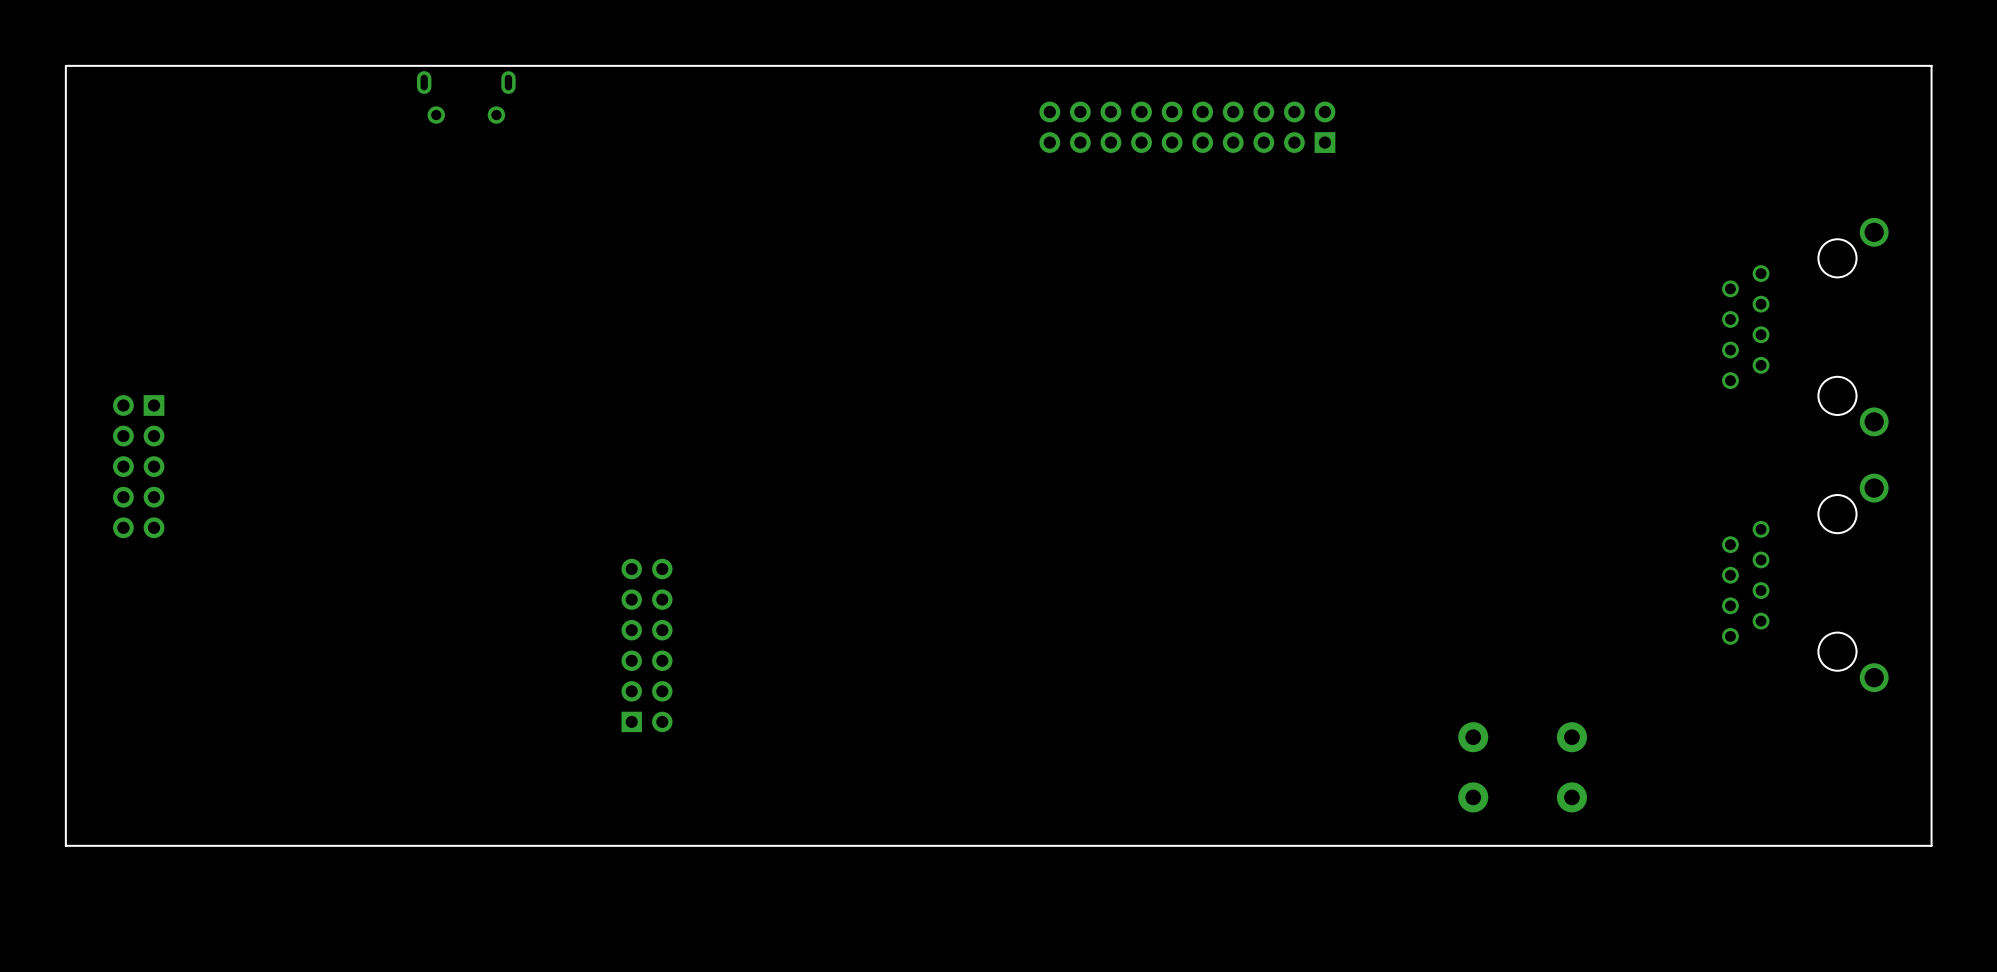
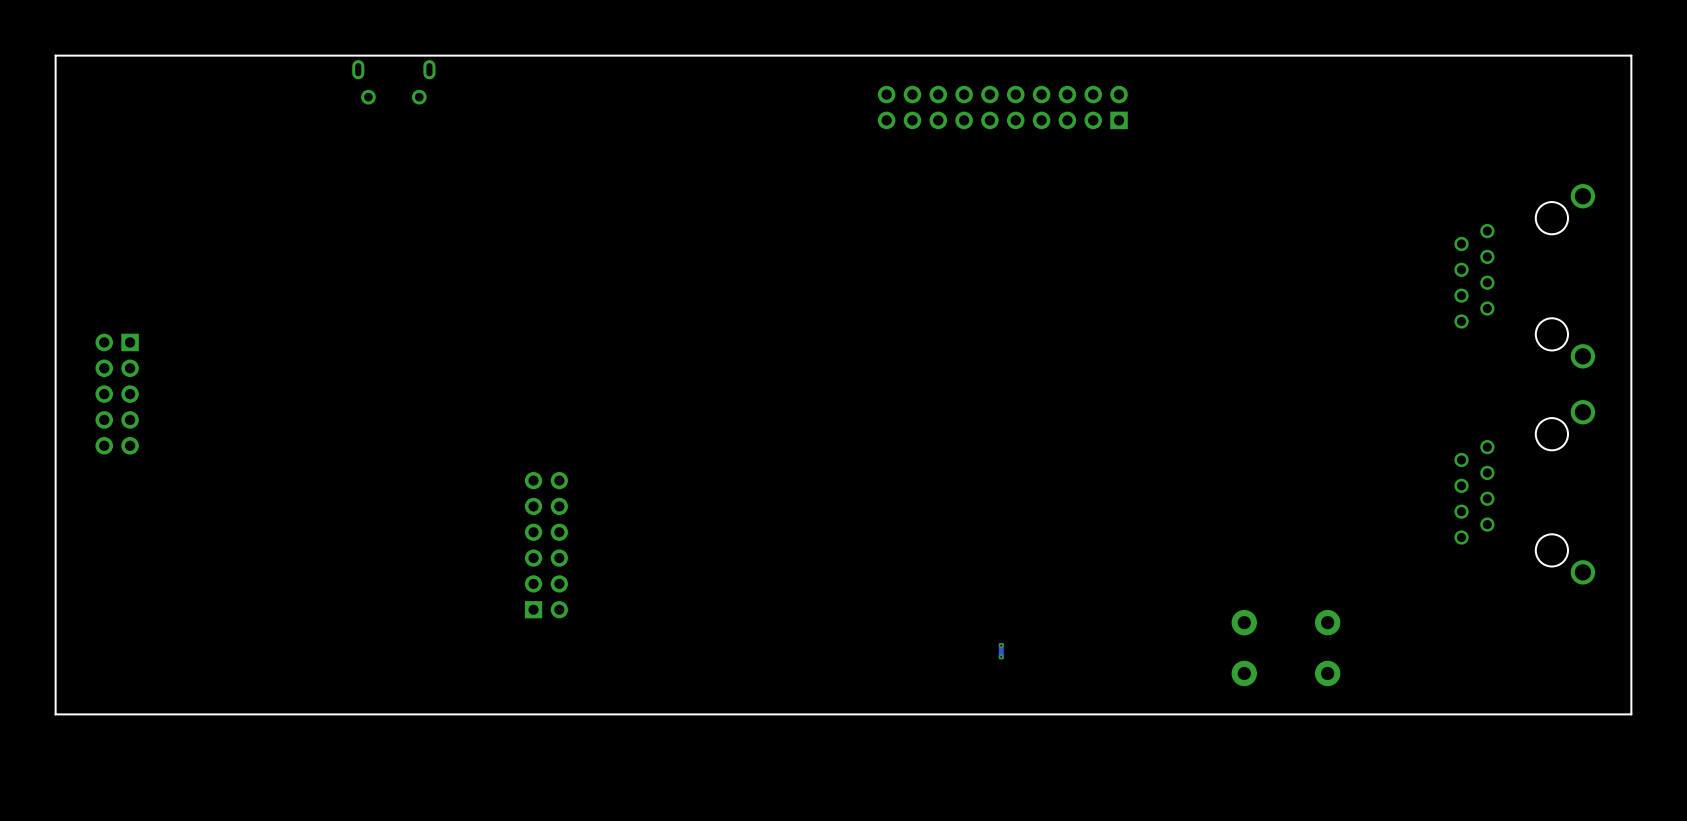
part: none -> (1001, 651)

